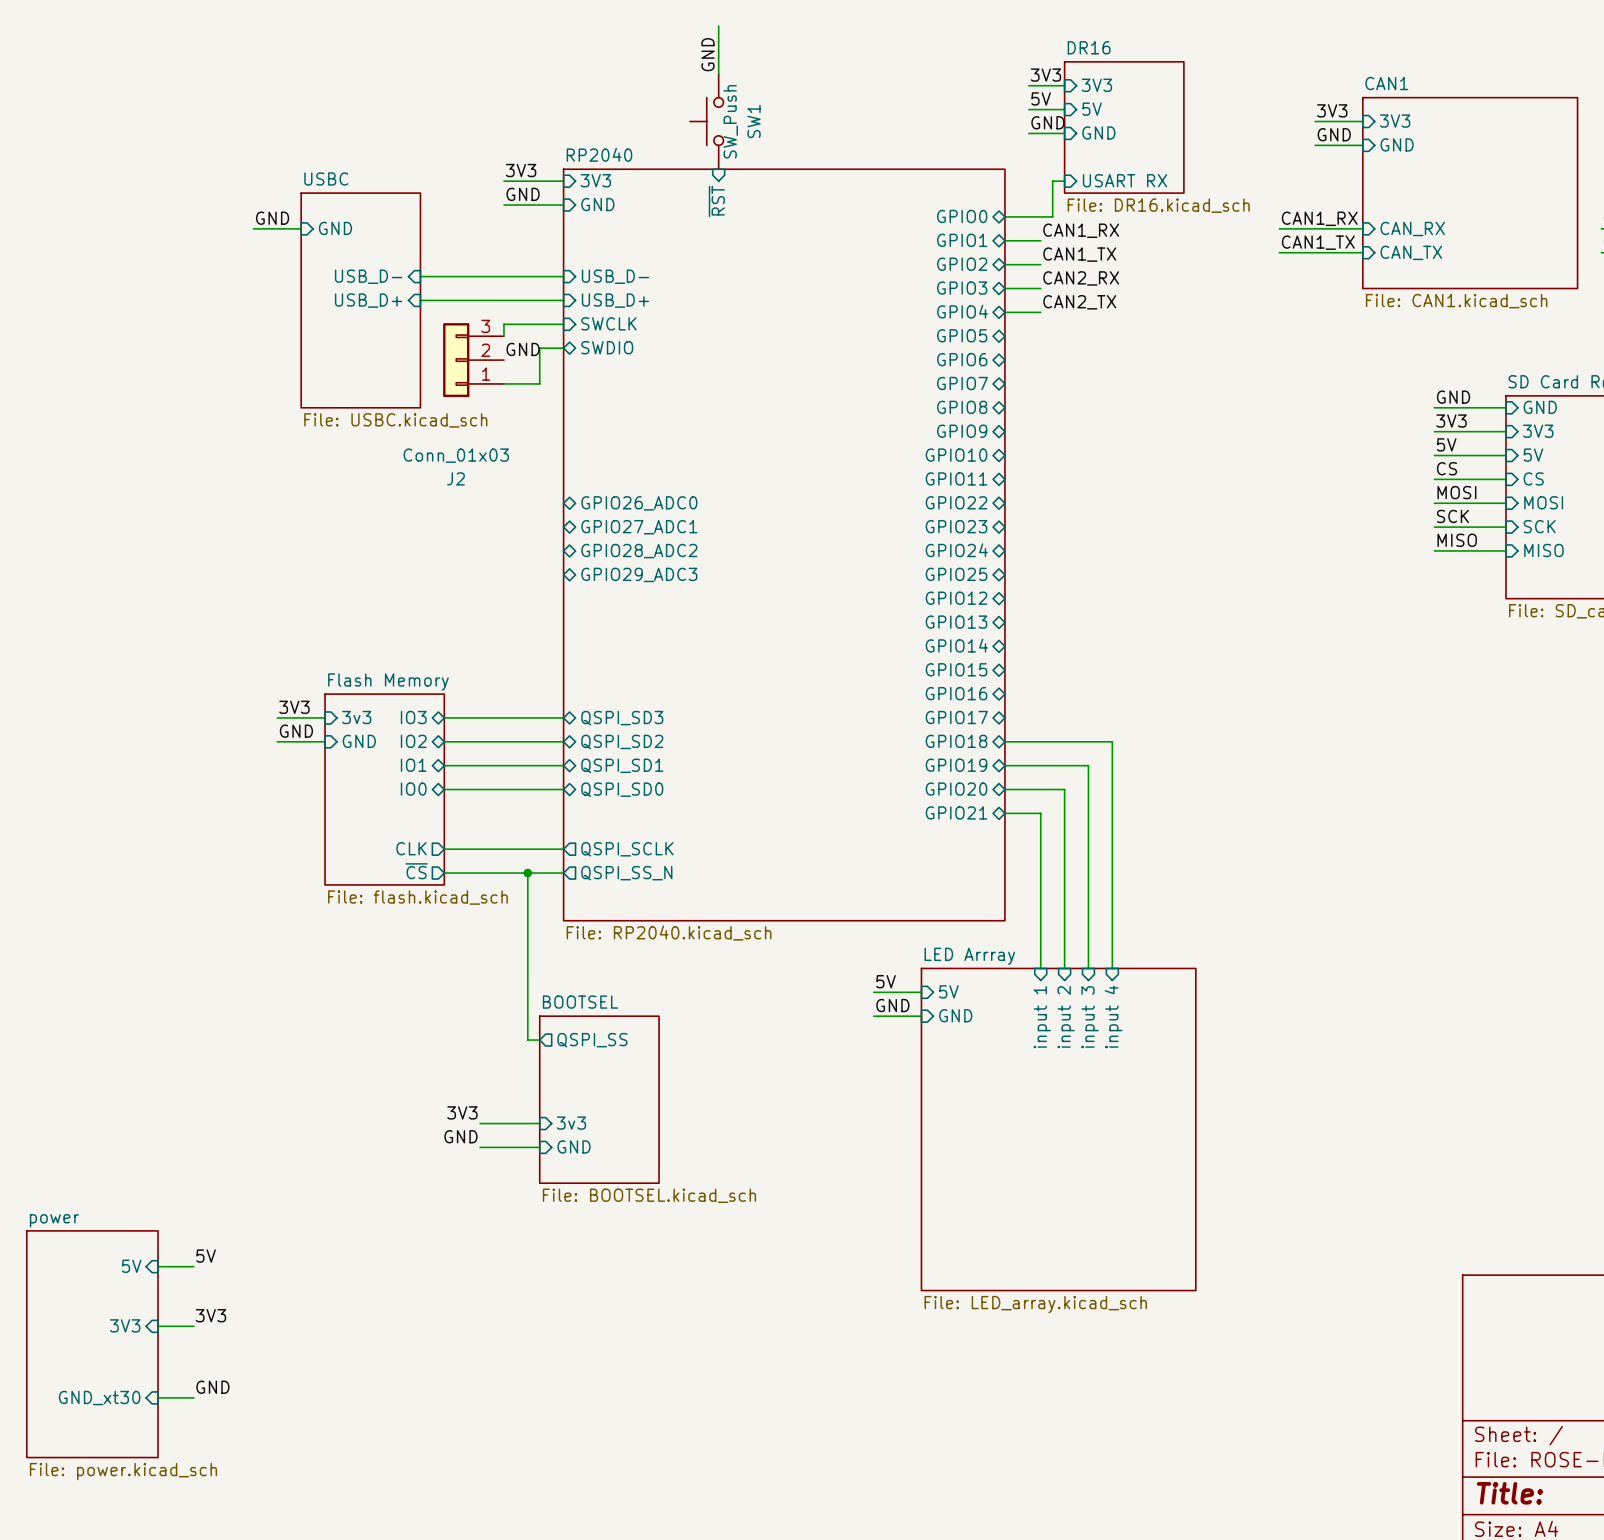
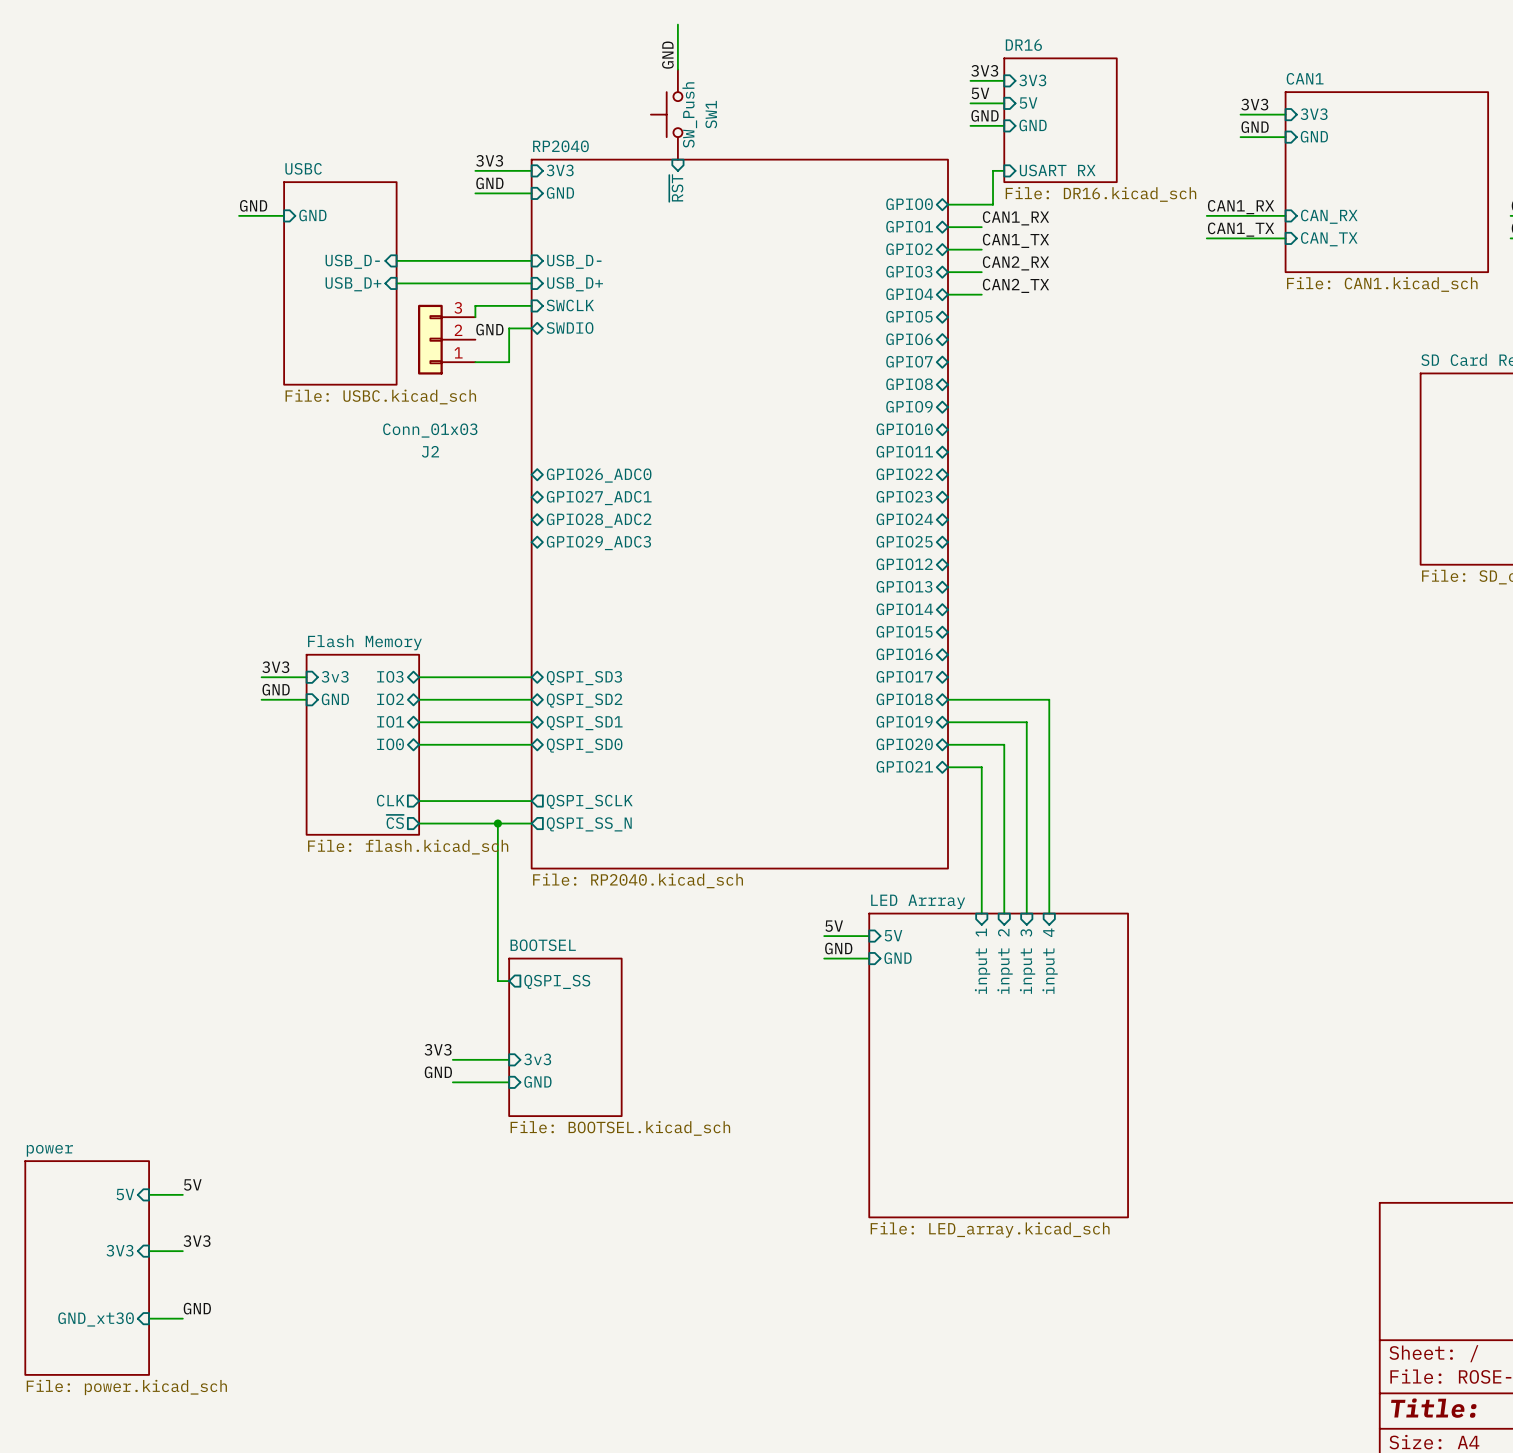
label: GND (1453, 397) -> none
wire: (1434, 407) (1505, 407) -> none
sheet pin: GND (1540, 407) -> none
label: 3V3 (1451, 421) -> none
wire: (1434, 431) (1505, 431) -> none
sheet pin: 3V3 (1538, 431) -> none
label: 5V (1446, 444) -> none
wire: (1434, 455) (1505, 455) -> none
sheet pin: 5V (1533, 455) -> none
label: CS (1446, 468) -> none
sheet pin: CS (1533, 478) -> none
wire: (1434, 479) (1505, 479) -> none
label: MOSI (1456, 492) -> none
sheet pin: MOSI (1543, 502) -> none
wire: (1434, 503) (1505, 503) -> none
label: SCK (1452, 516) -> none
sheet pin: SCK (1539, 526) -> none
wire: (1434, 527) (1505, 527) -> none
label: MISO (1457, 540) -> none
wire: (1434, 550) (1505, 550) -> none
sheet pin: MISO (1543, 550) -> none

